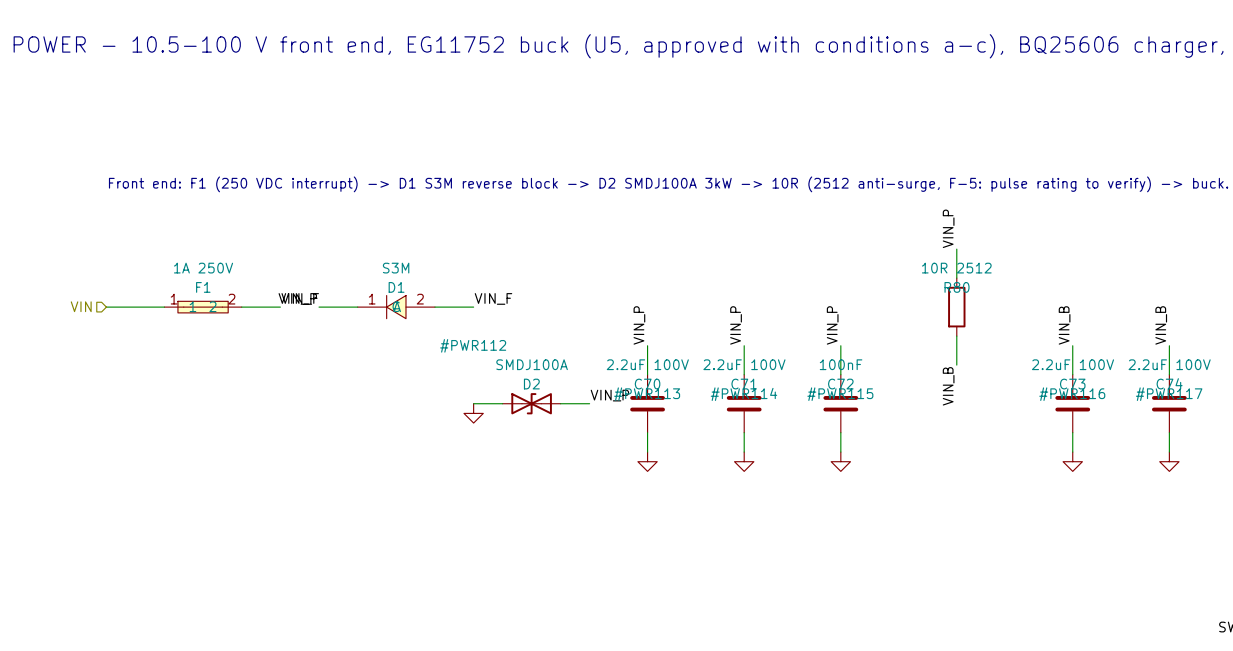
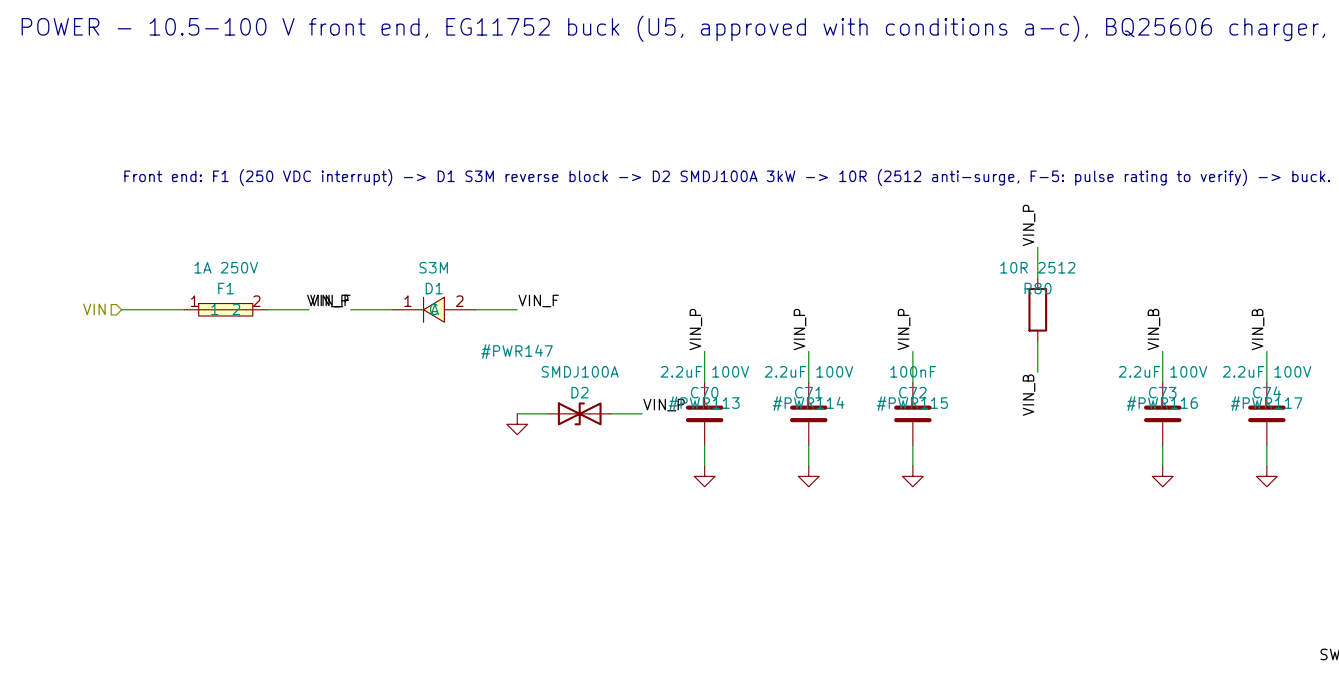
#PWR112 name: #PWR112 (473, 345) -> #PWR147 (517, 351)

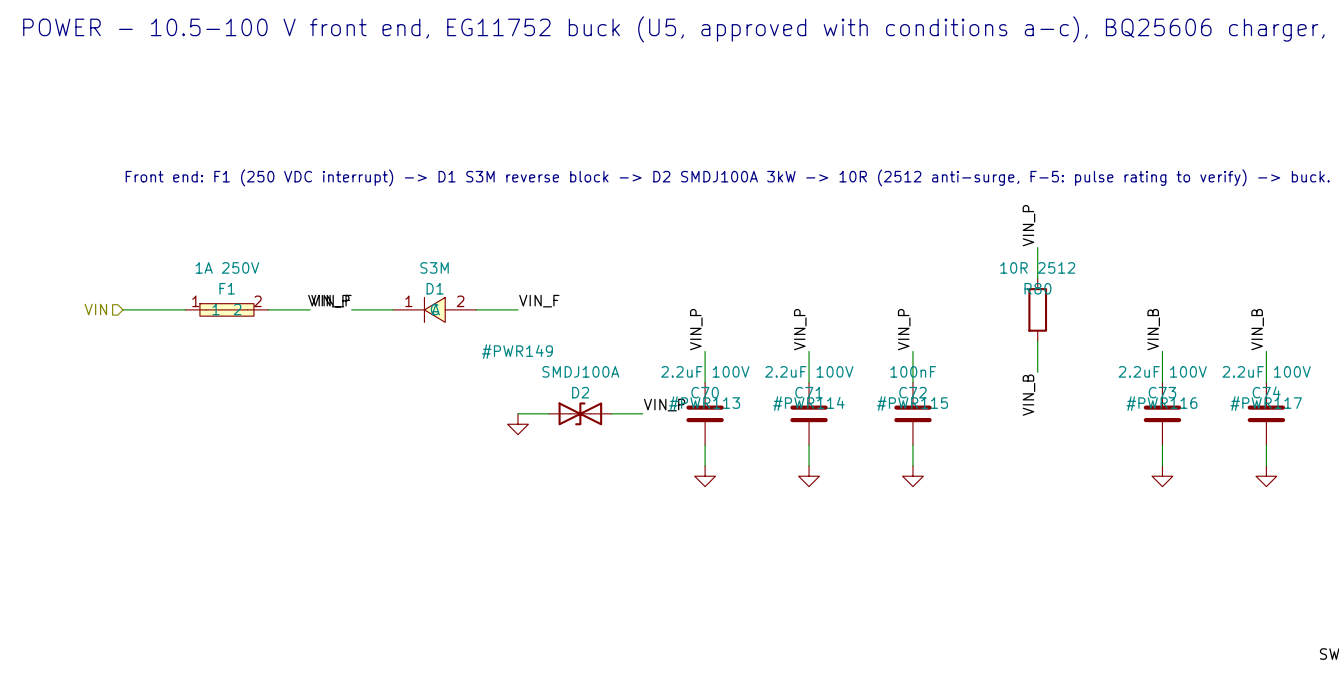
#PWR147 name: #PWR147 (517, 351) -> #PWR149 (517, 351)

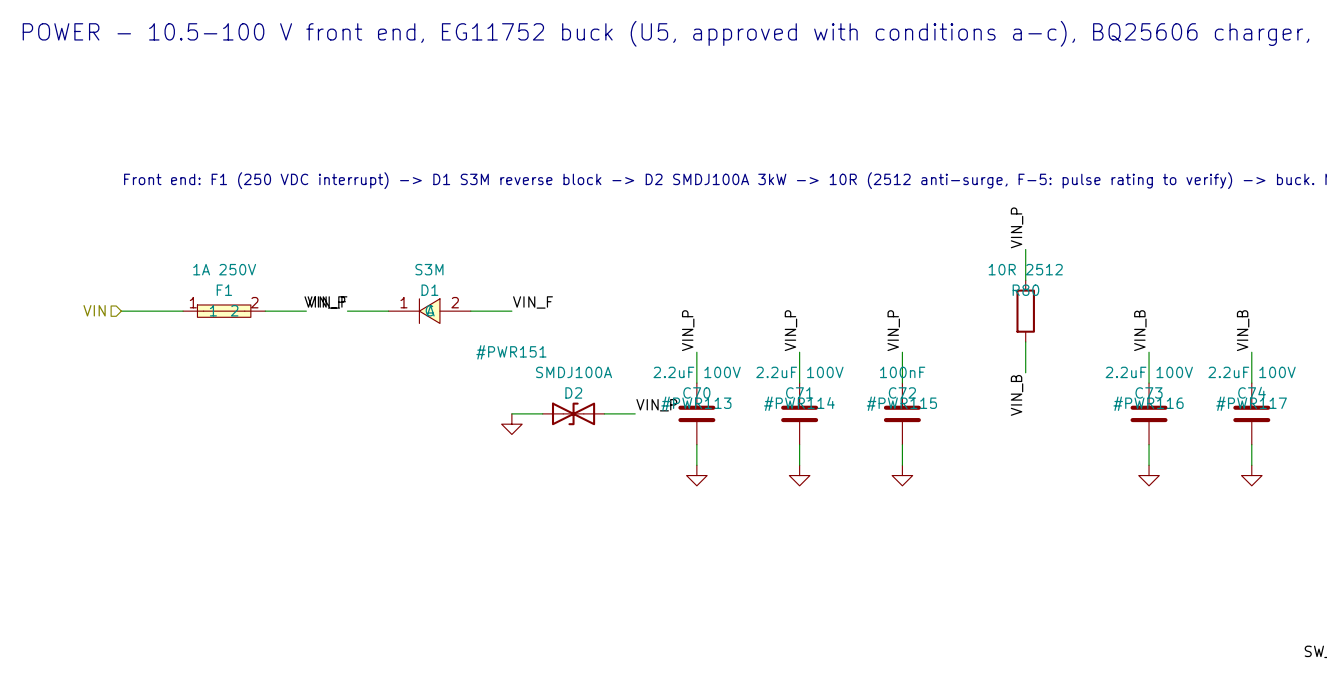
#PWR149 name: #PWR149 (517, 351) -> #PWR151 (511, 352)

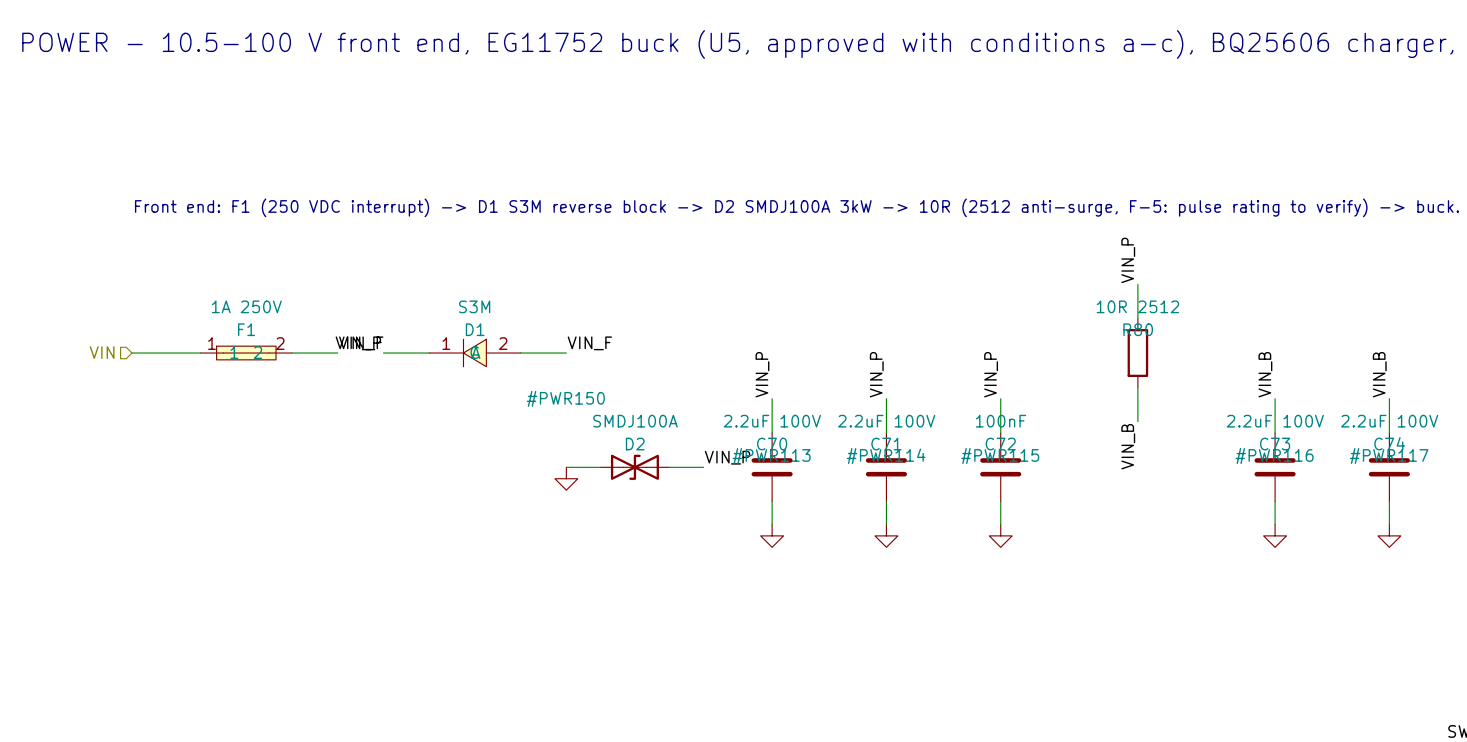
#PWR151 name: #PWR151 (511, 352) -> #PWR150 (565, 398)

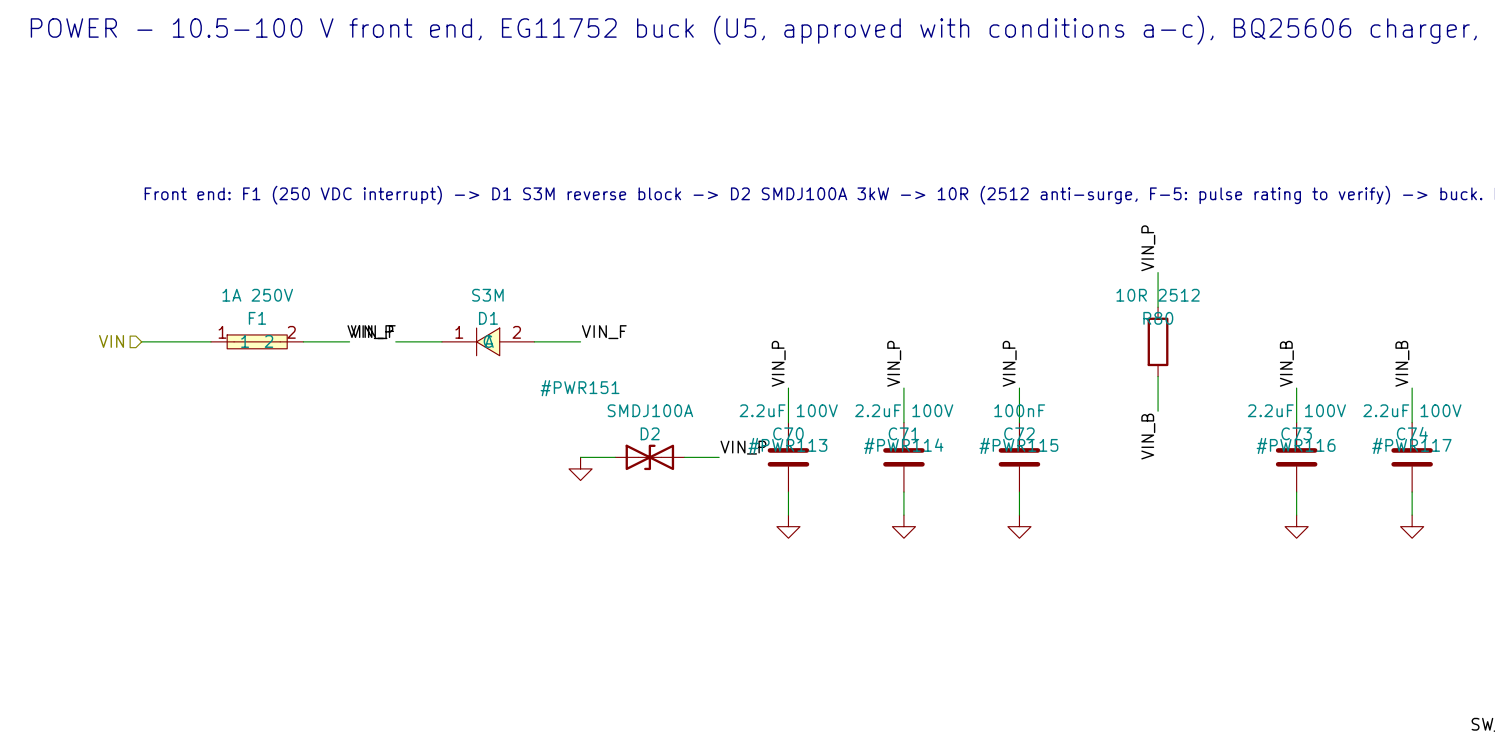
#PWR150 name: #PWR150 (565, 398) -> #PWR151 (580, 388)

